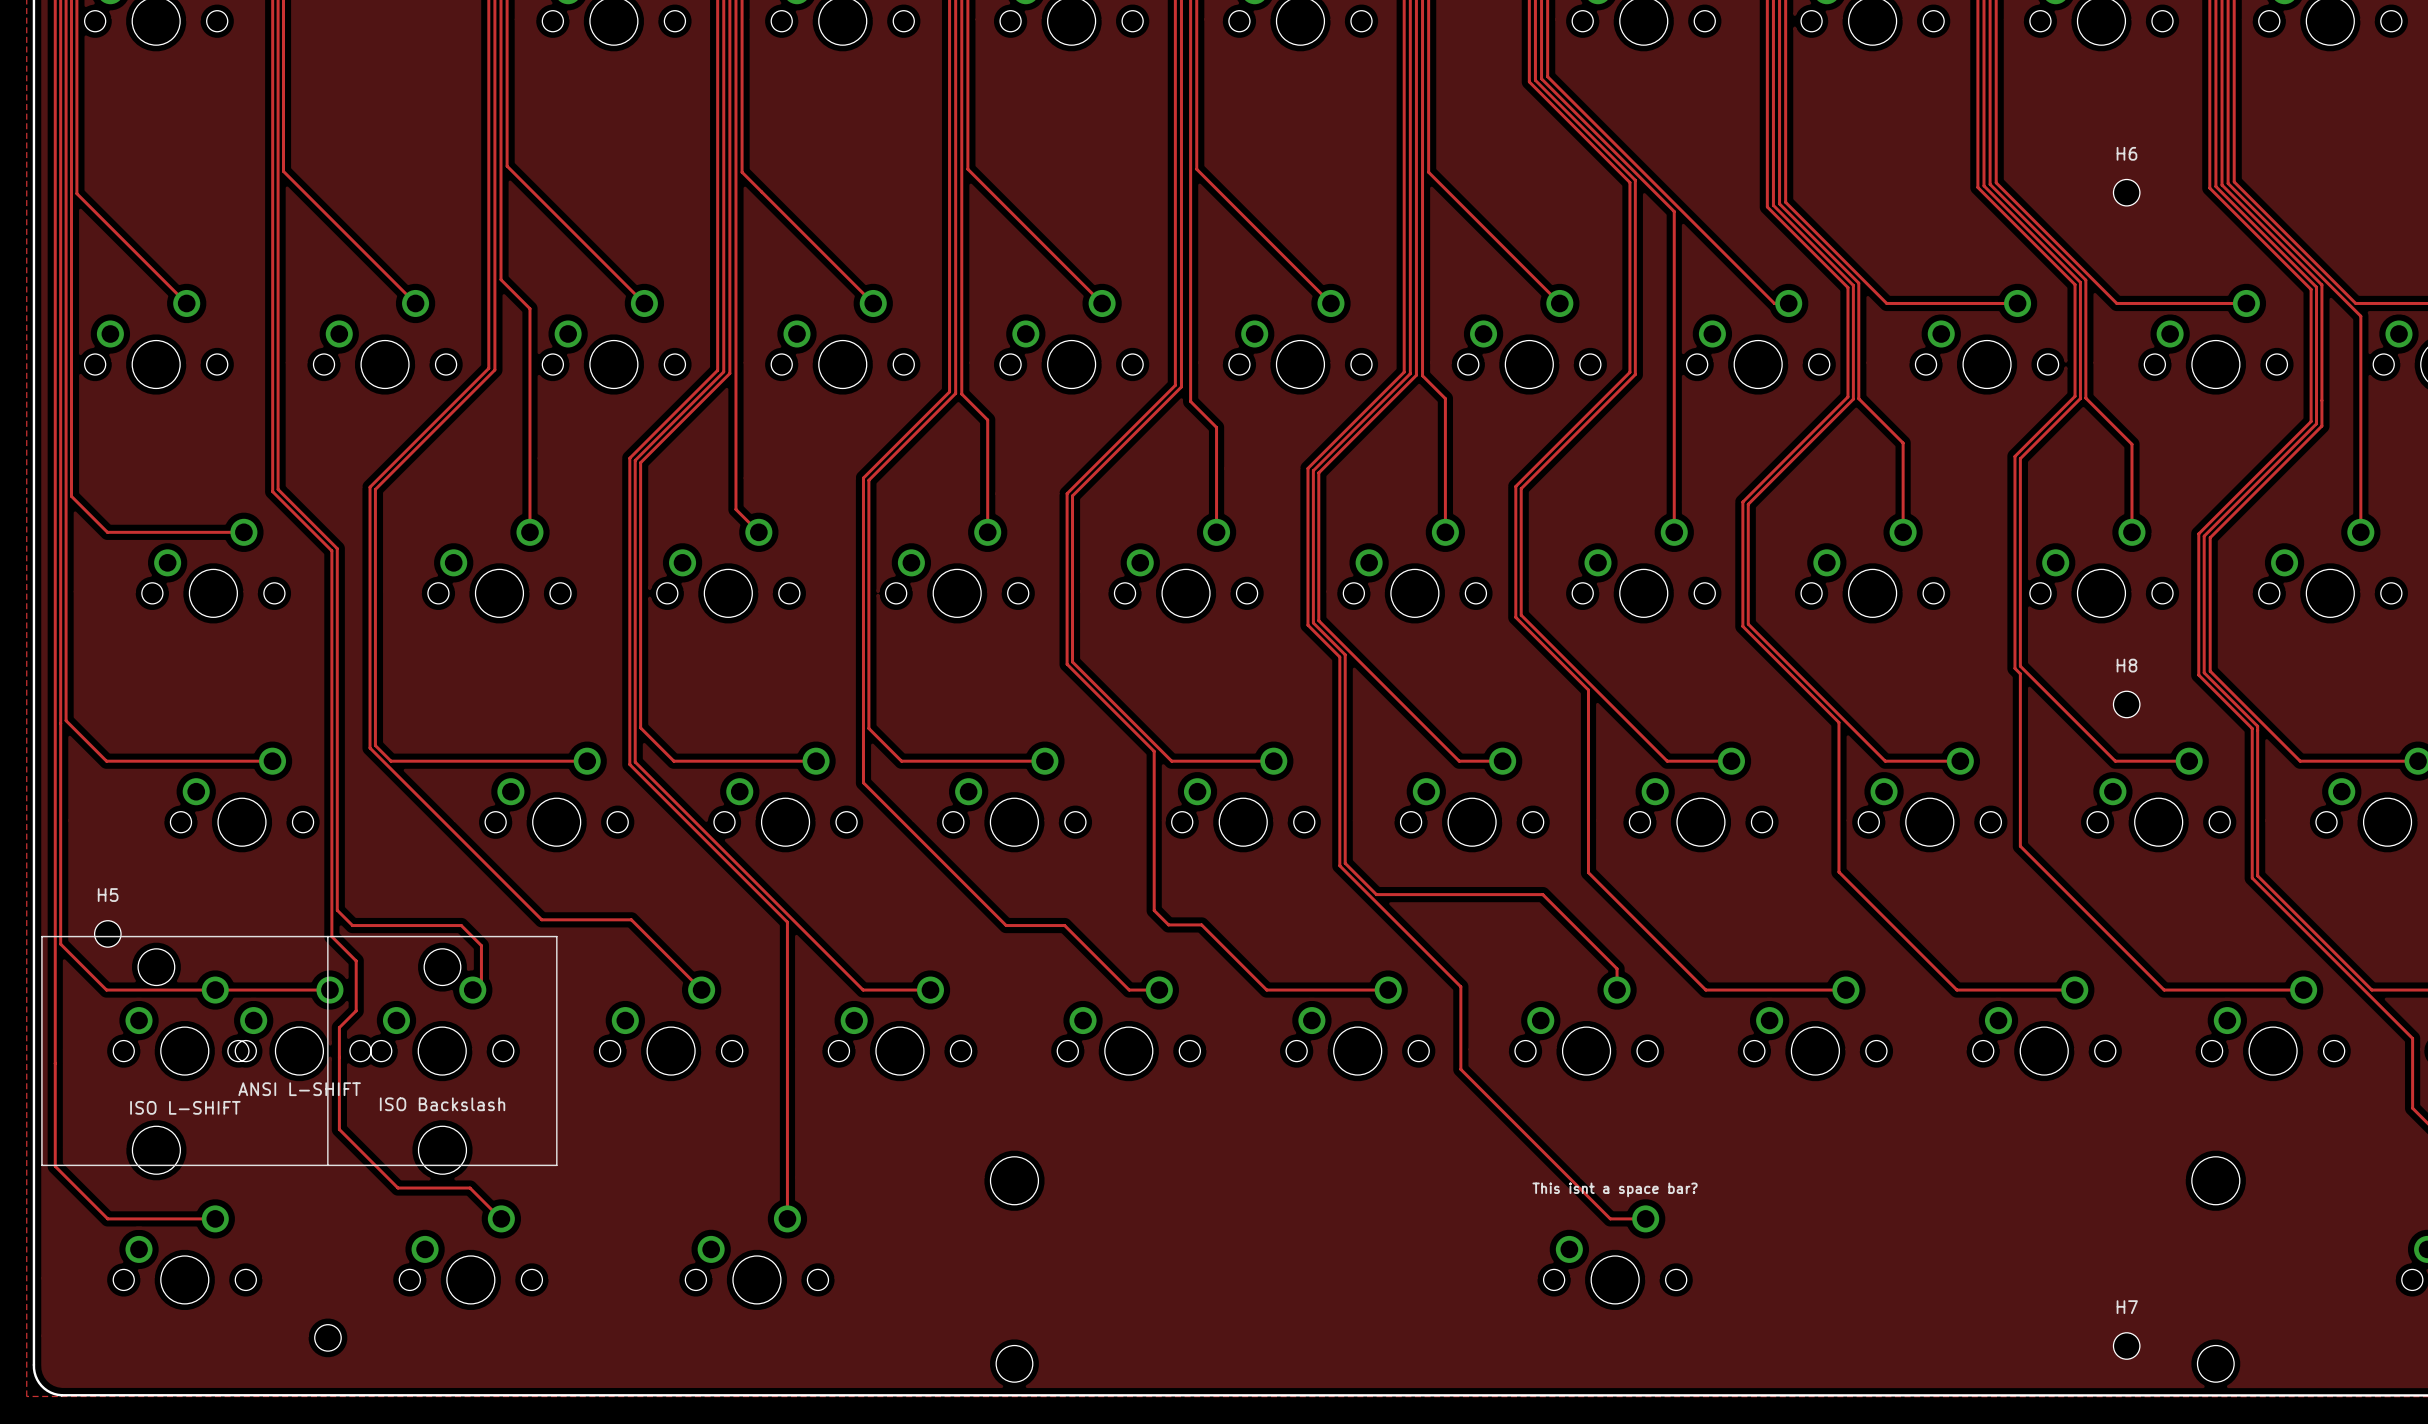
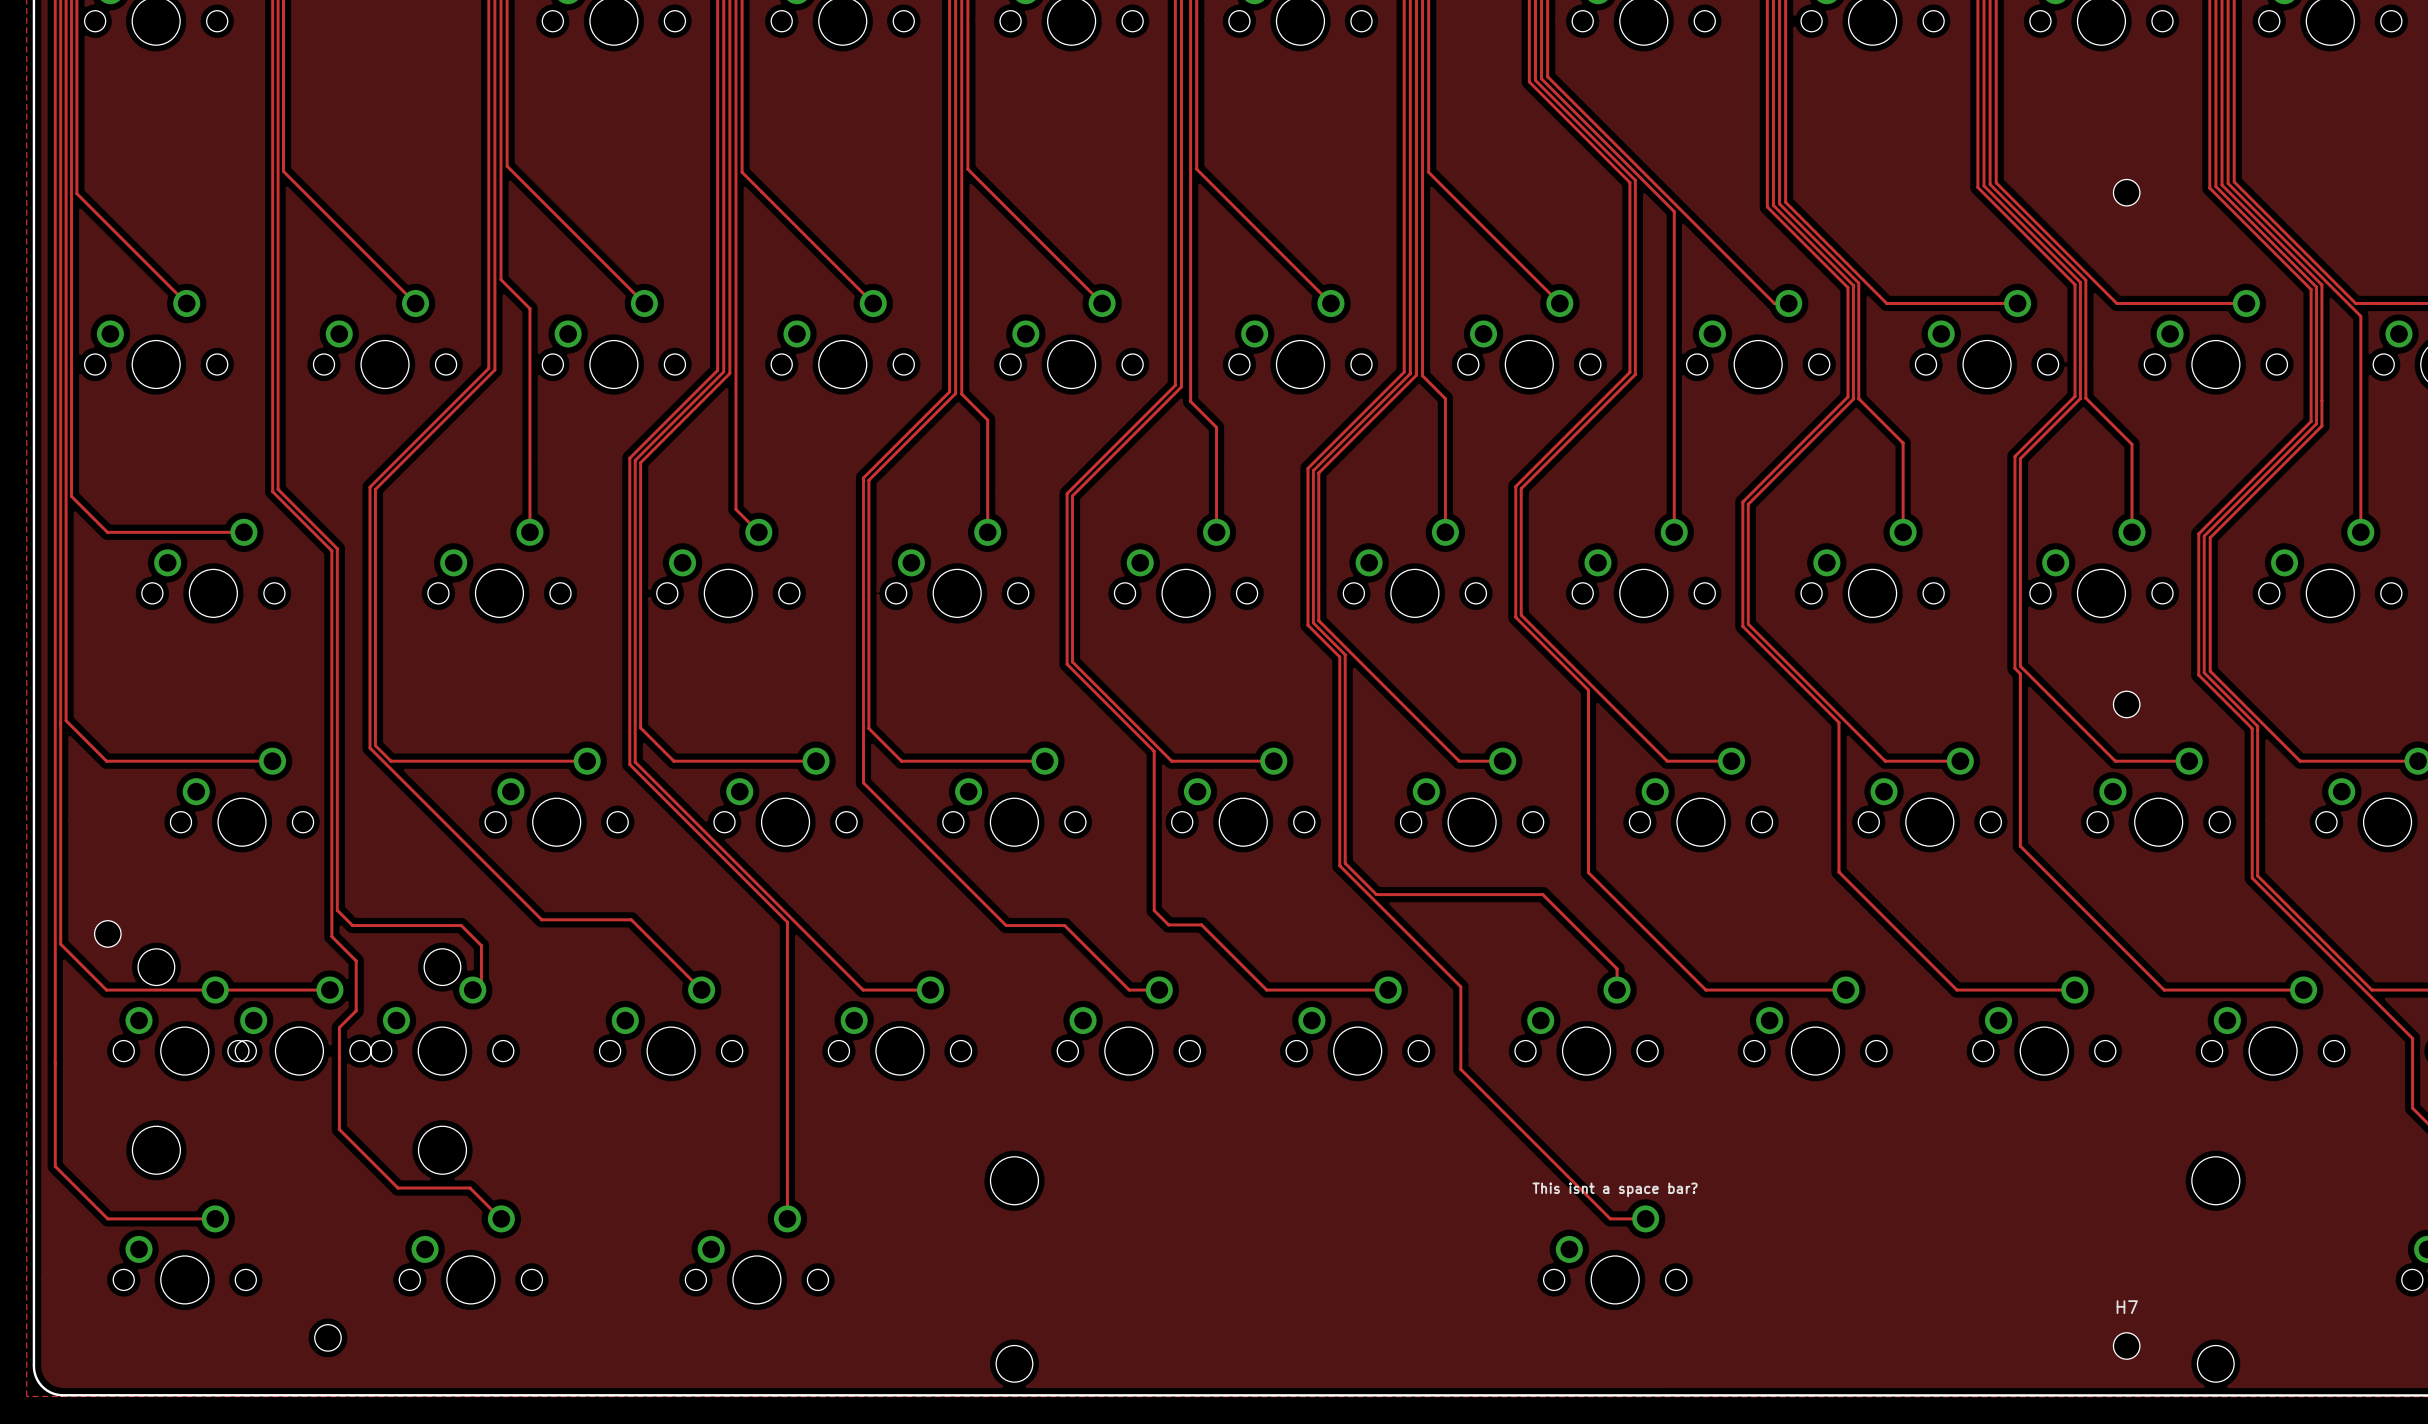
H6 name: H6 (2126, 153) -> none
H8 name: H8 (2126, 665) -> none
H5 name: H5 (108, 895) -> none
line: (41, 936) (41, 1165) (556, 1165) (556, 936) (41, 936) -> none
line: (327, 936) (327, 1165) -> none
text: ANSI L-SHIFT (299, 1089) -> none
text: ISO Backslash (442, 1104) -> none
text: ISO L-SHIFT (185, 1107) -> none

